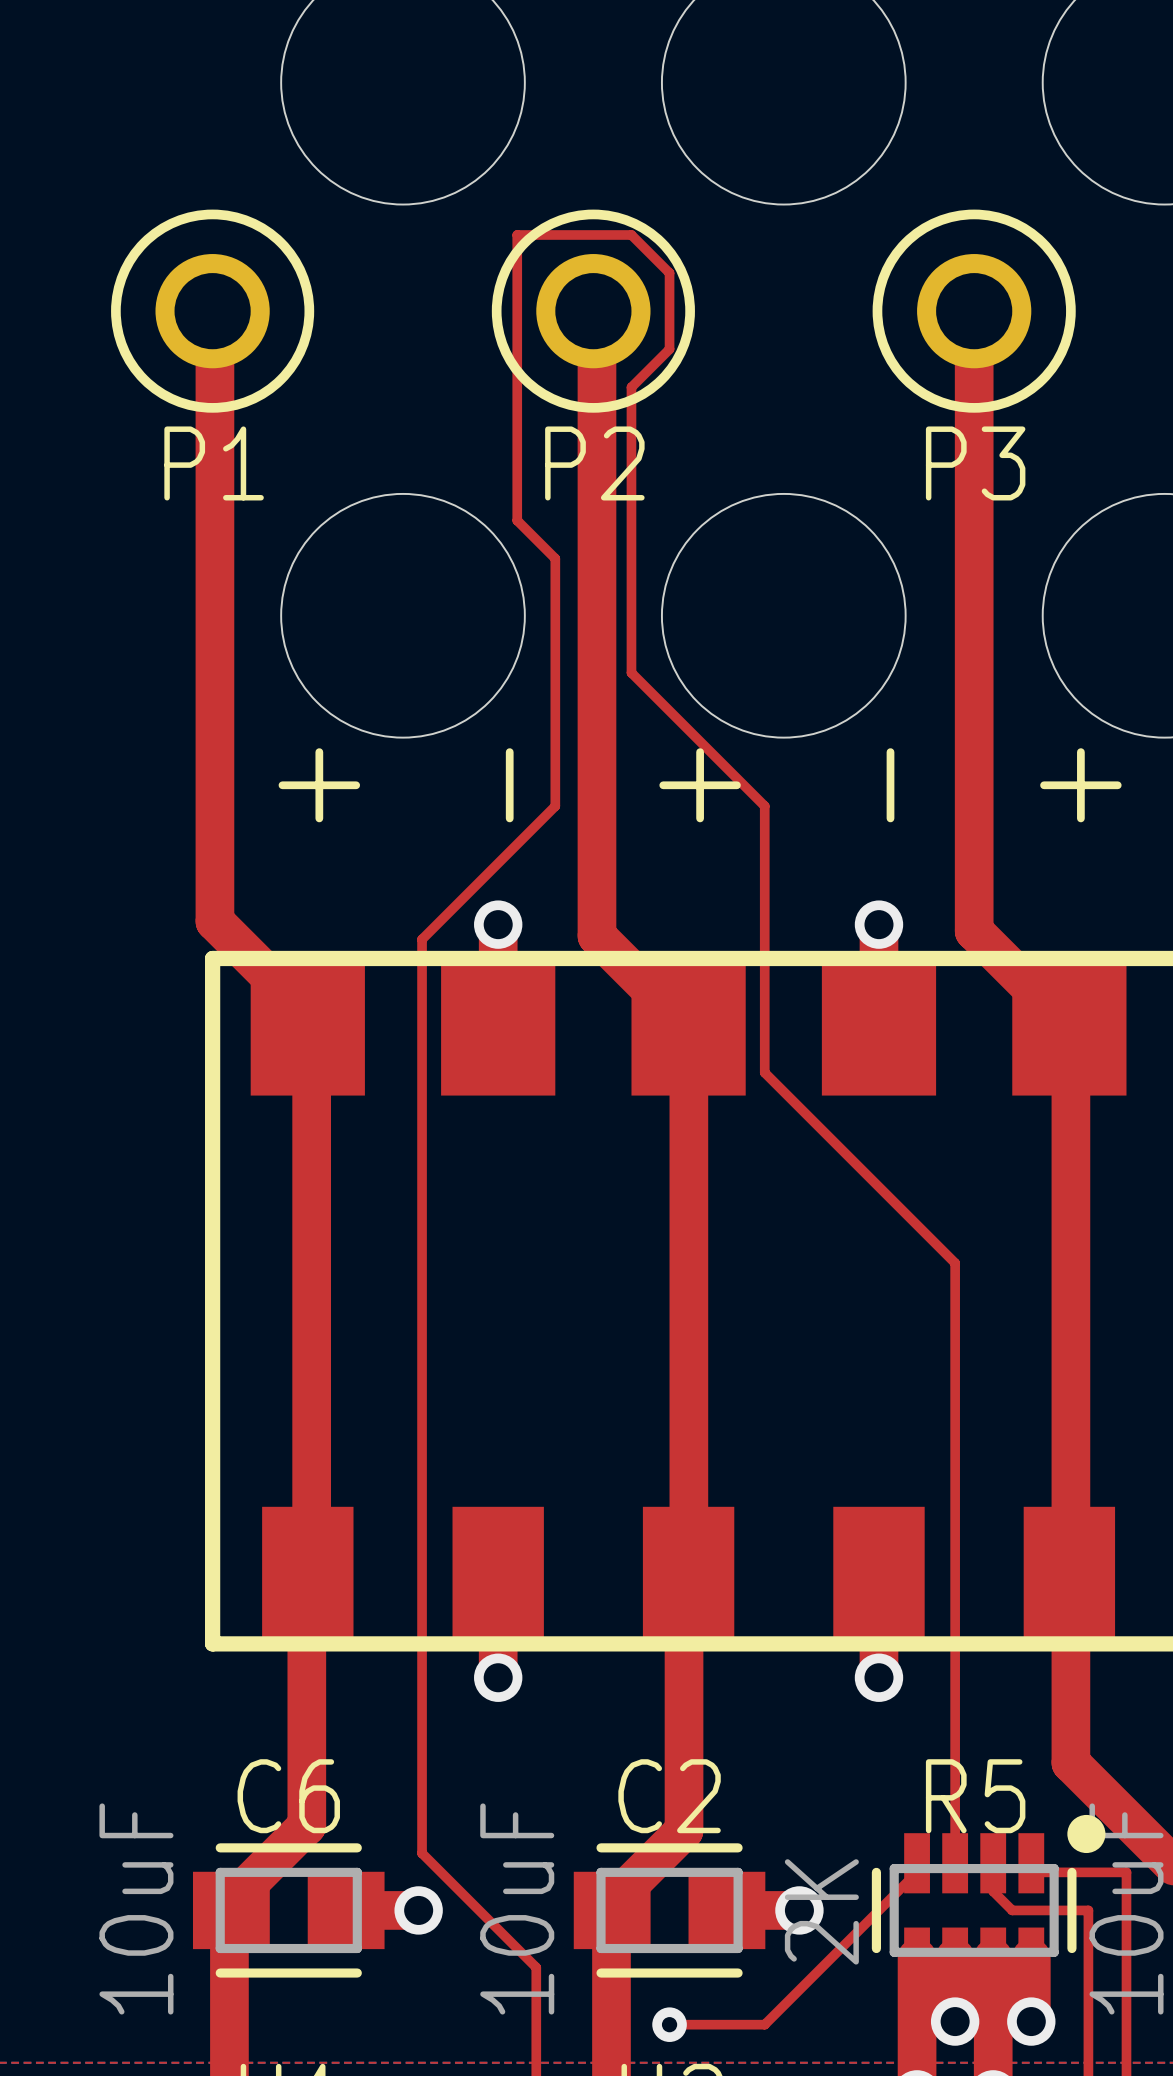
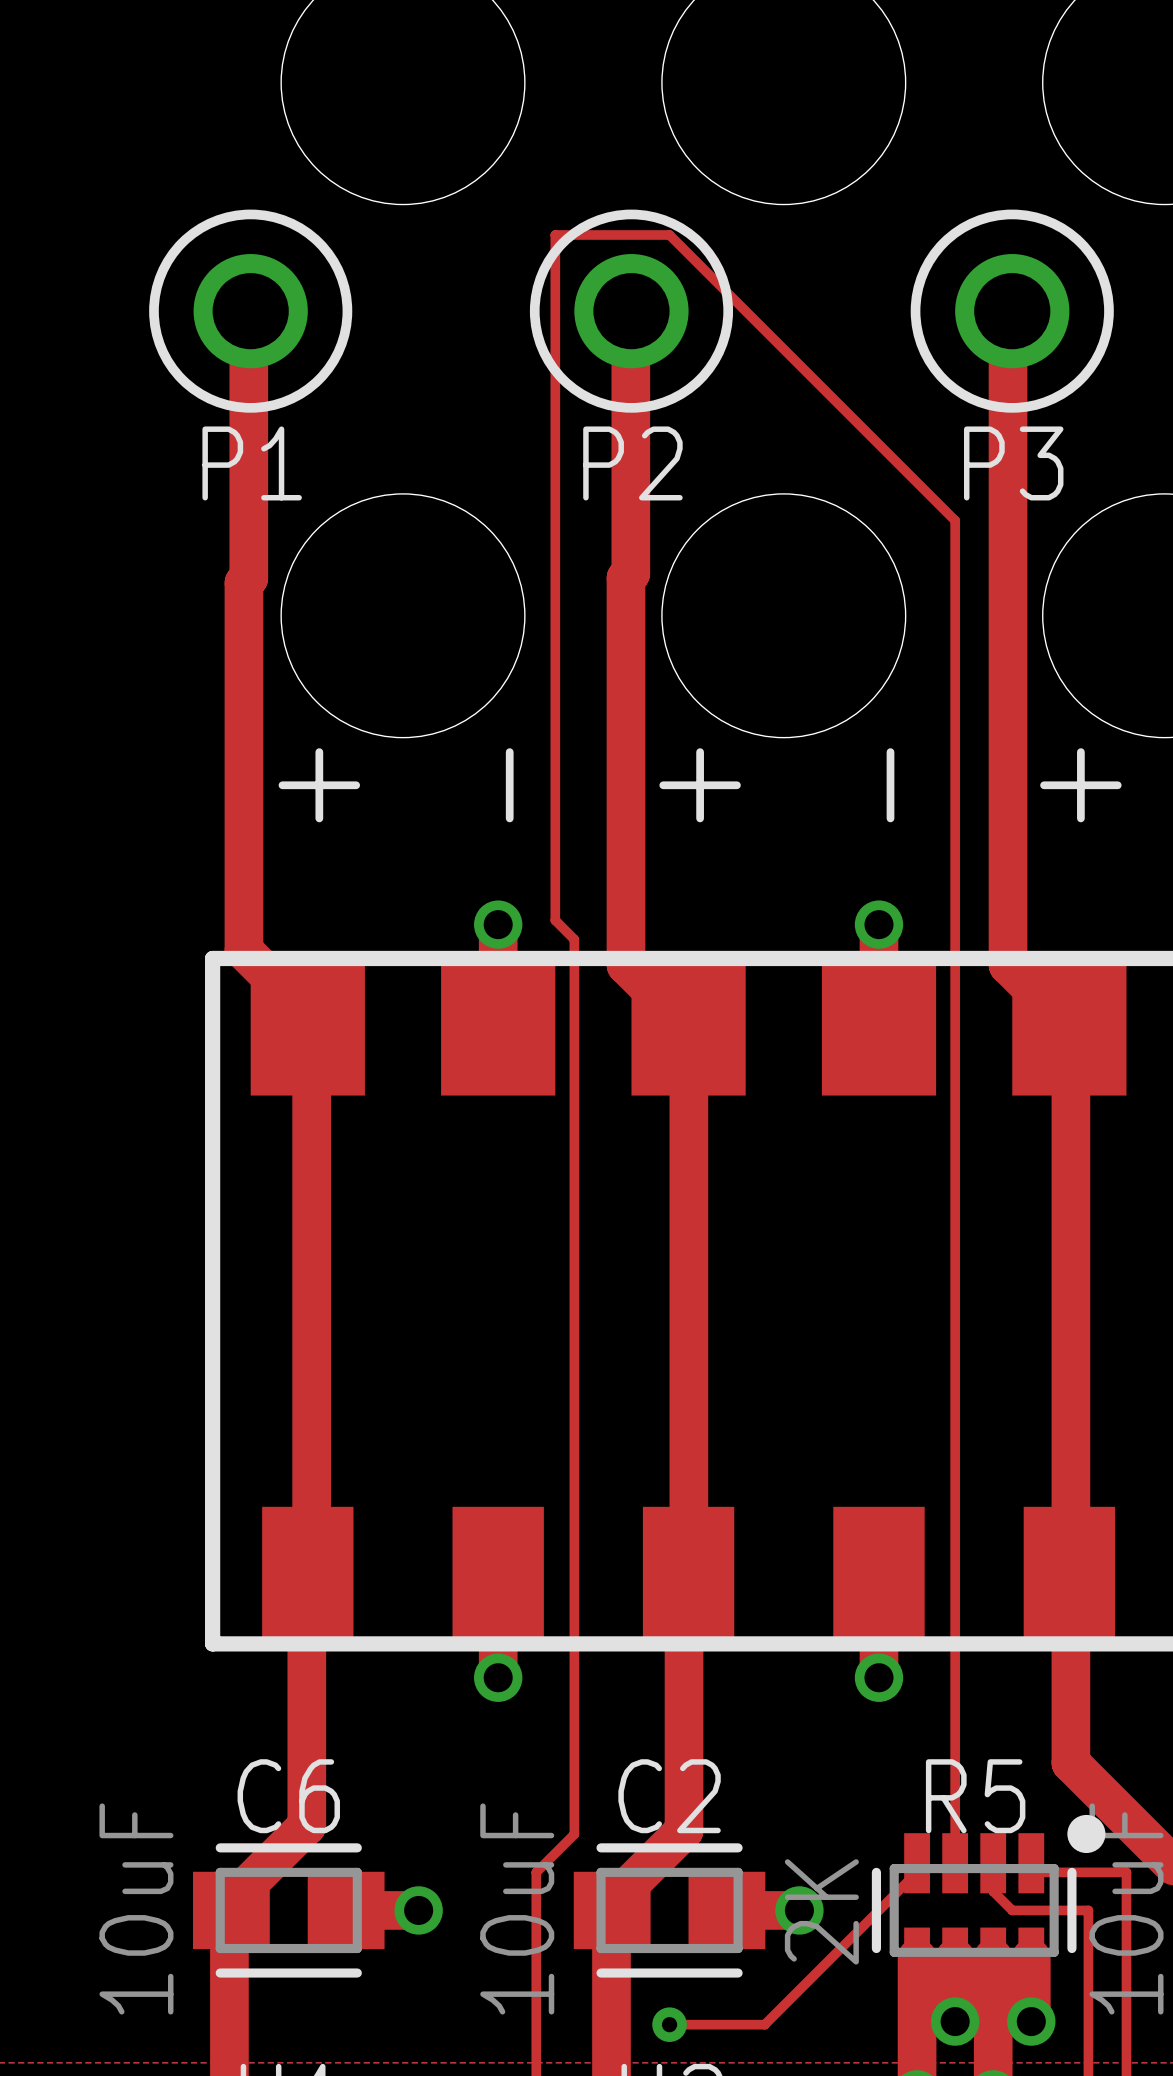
top track: (555, 234) (517, 234) (517, 520) (555, 558) -> (555, 234) (555, 558)
top track: (631, 234) (669, 273) (669, 349) (631, 387) (631, 672) (764, 806) (764, 1072) (955, 1263) -> (631, 234) (669, 234) (955, 520) (955, 1263)
top track: (212, 311) (214, 312) (214, 921) (243, 950) -> (250, 311) (248, 312) (248, 578) (243, 582) (243, 950)
P1 position: (212, 311) -> (250, 311)
top track: (593, 311) (596, 312) (596, 935) (625, 964) -> (630, 312) (630, 573) (625, 578) (625, 964)
P2 position: (593, 311) -> (631, 311)
top track: (974, 311) (974, 931) (1008, 964) -> (1012, 311) (1008, 312) (1008, 964)
P3 position: (974, 311) -> (1012, 311)
top track: (555, 806) (422, 939) (422, 1853) (536, 1967) -> (555, 806) (555, 920) (574, 939) (574, 1834) (536, 1872) (536, 1967)

